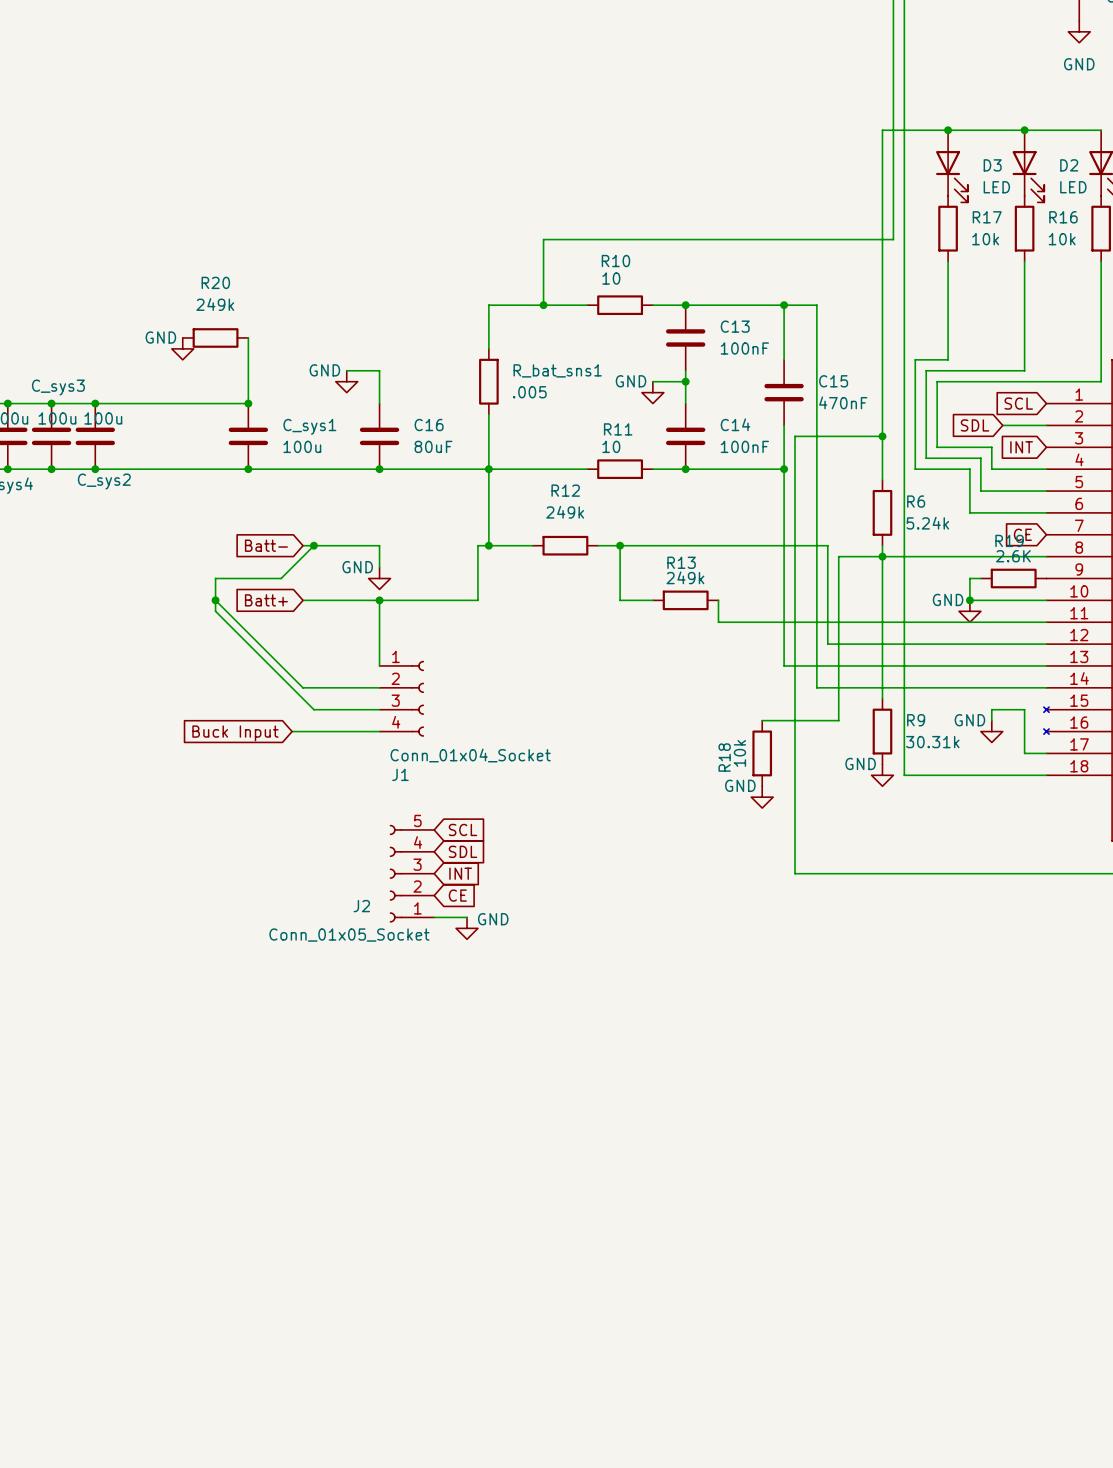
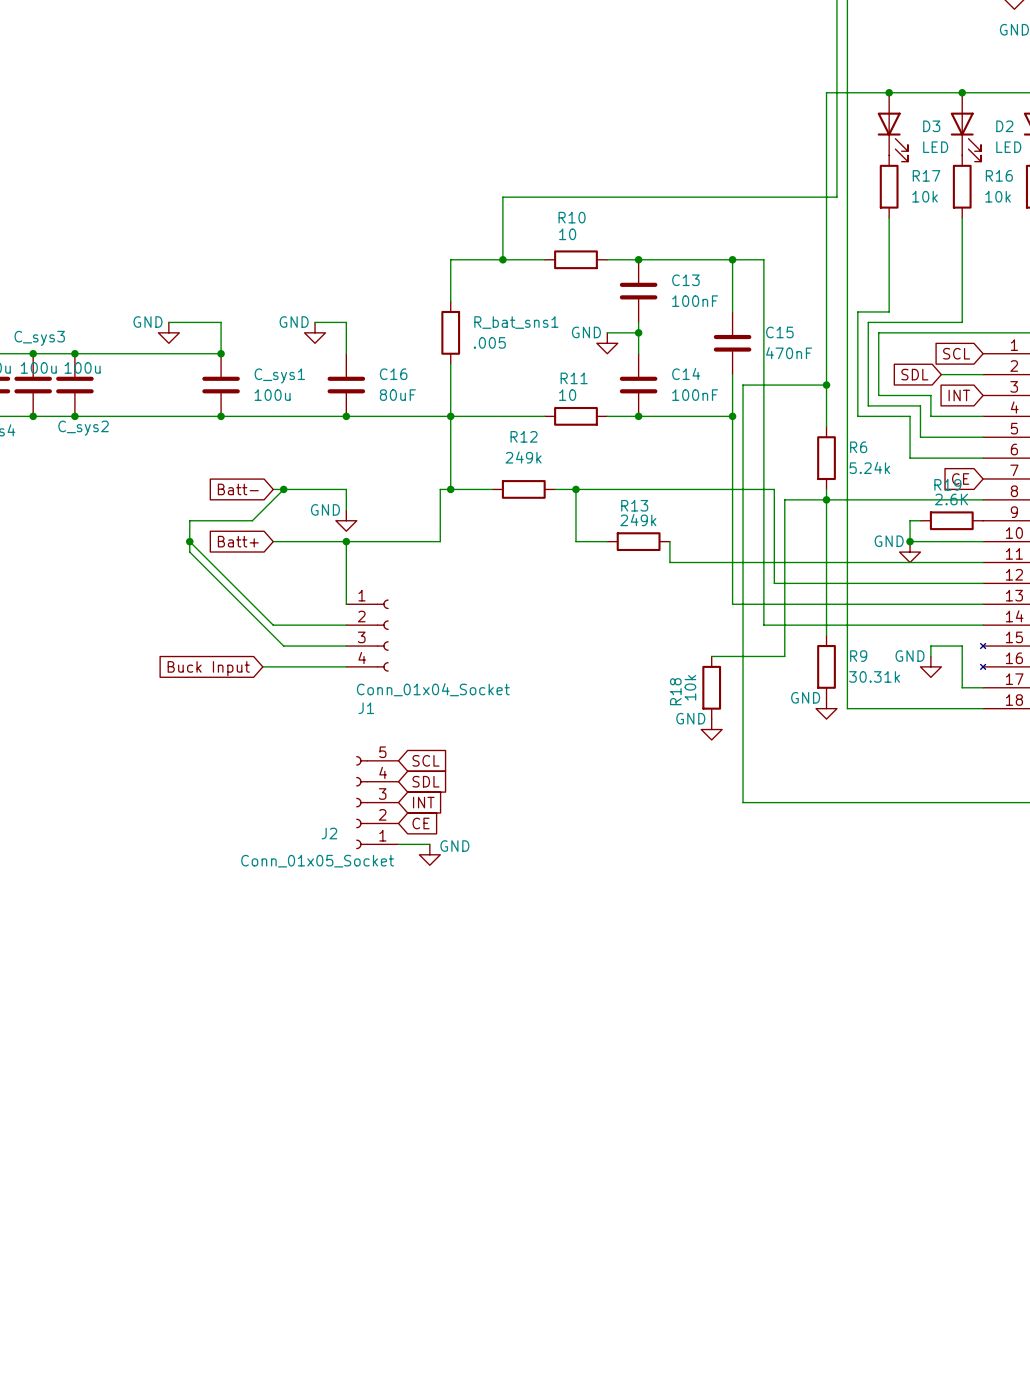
R20: 249k (215, 337) -> none
wire: (248, 337) (248, 370) -> (168, 322) (221, 322)
power symbol position: GND (182, 348) -> GND (168, 332)

